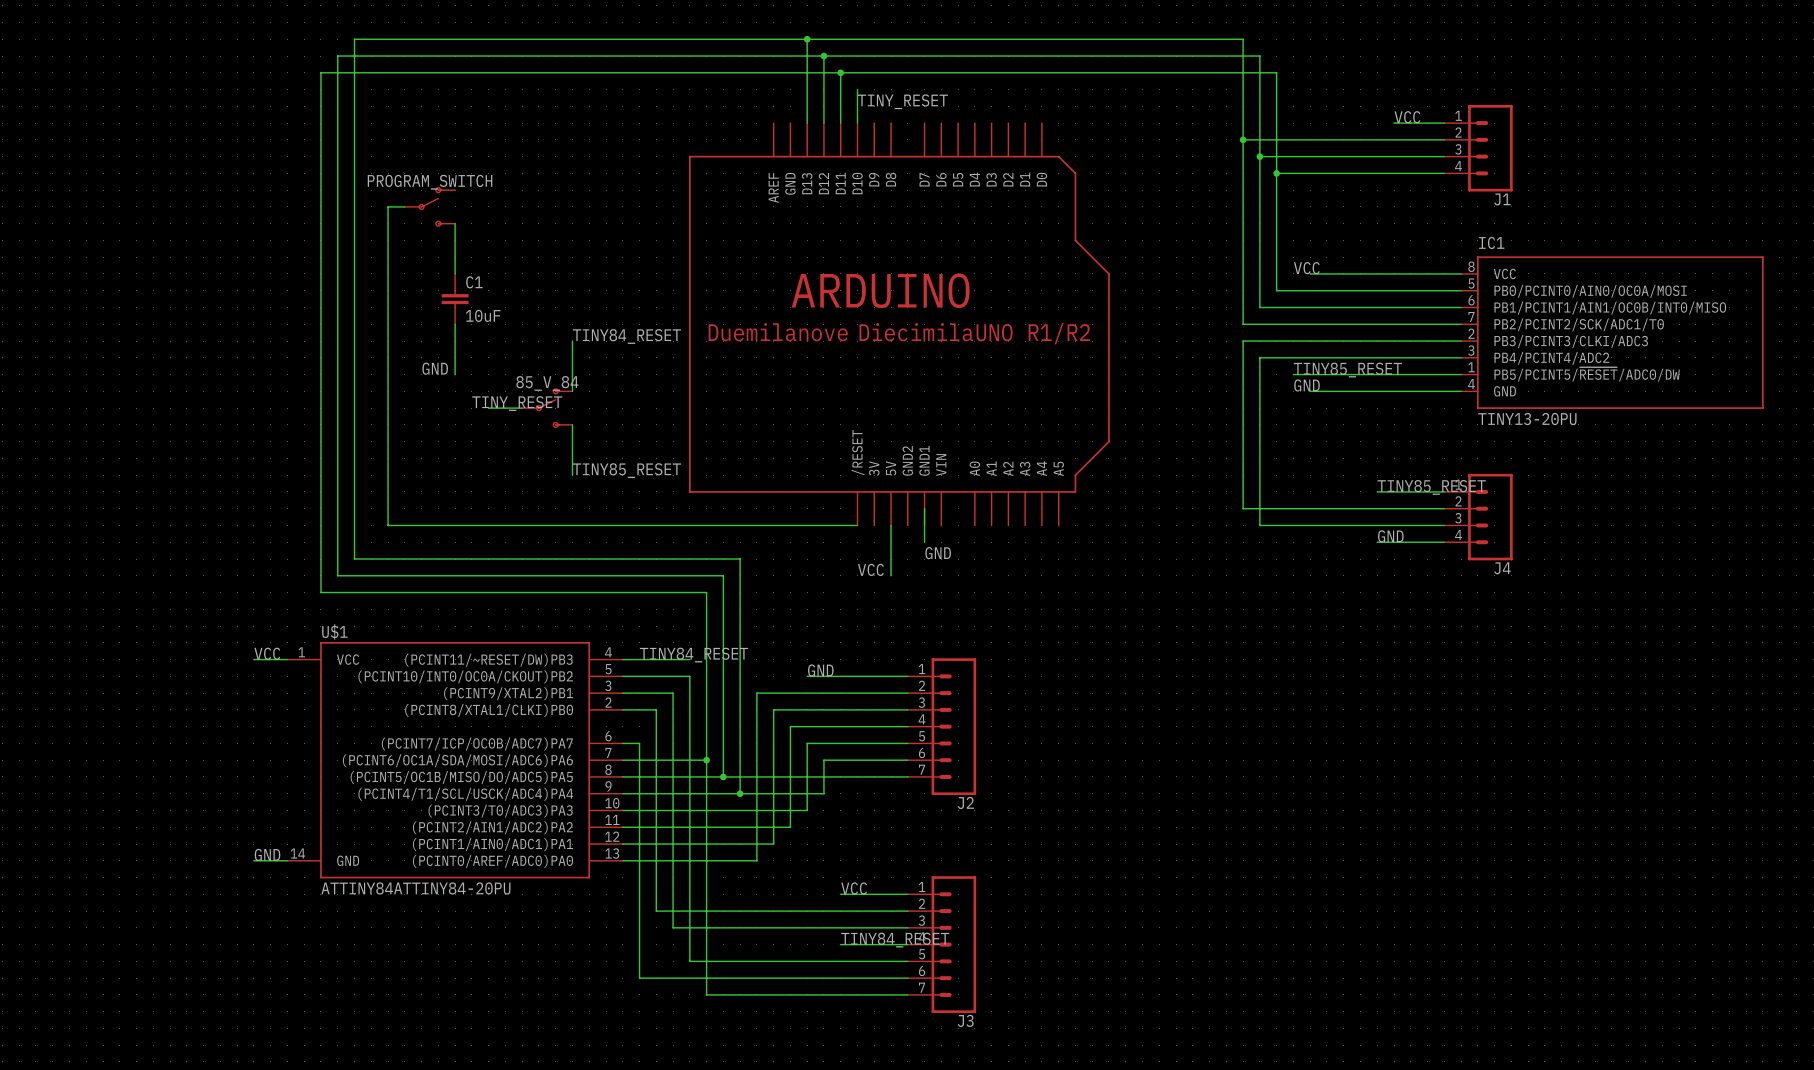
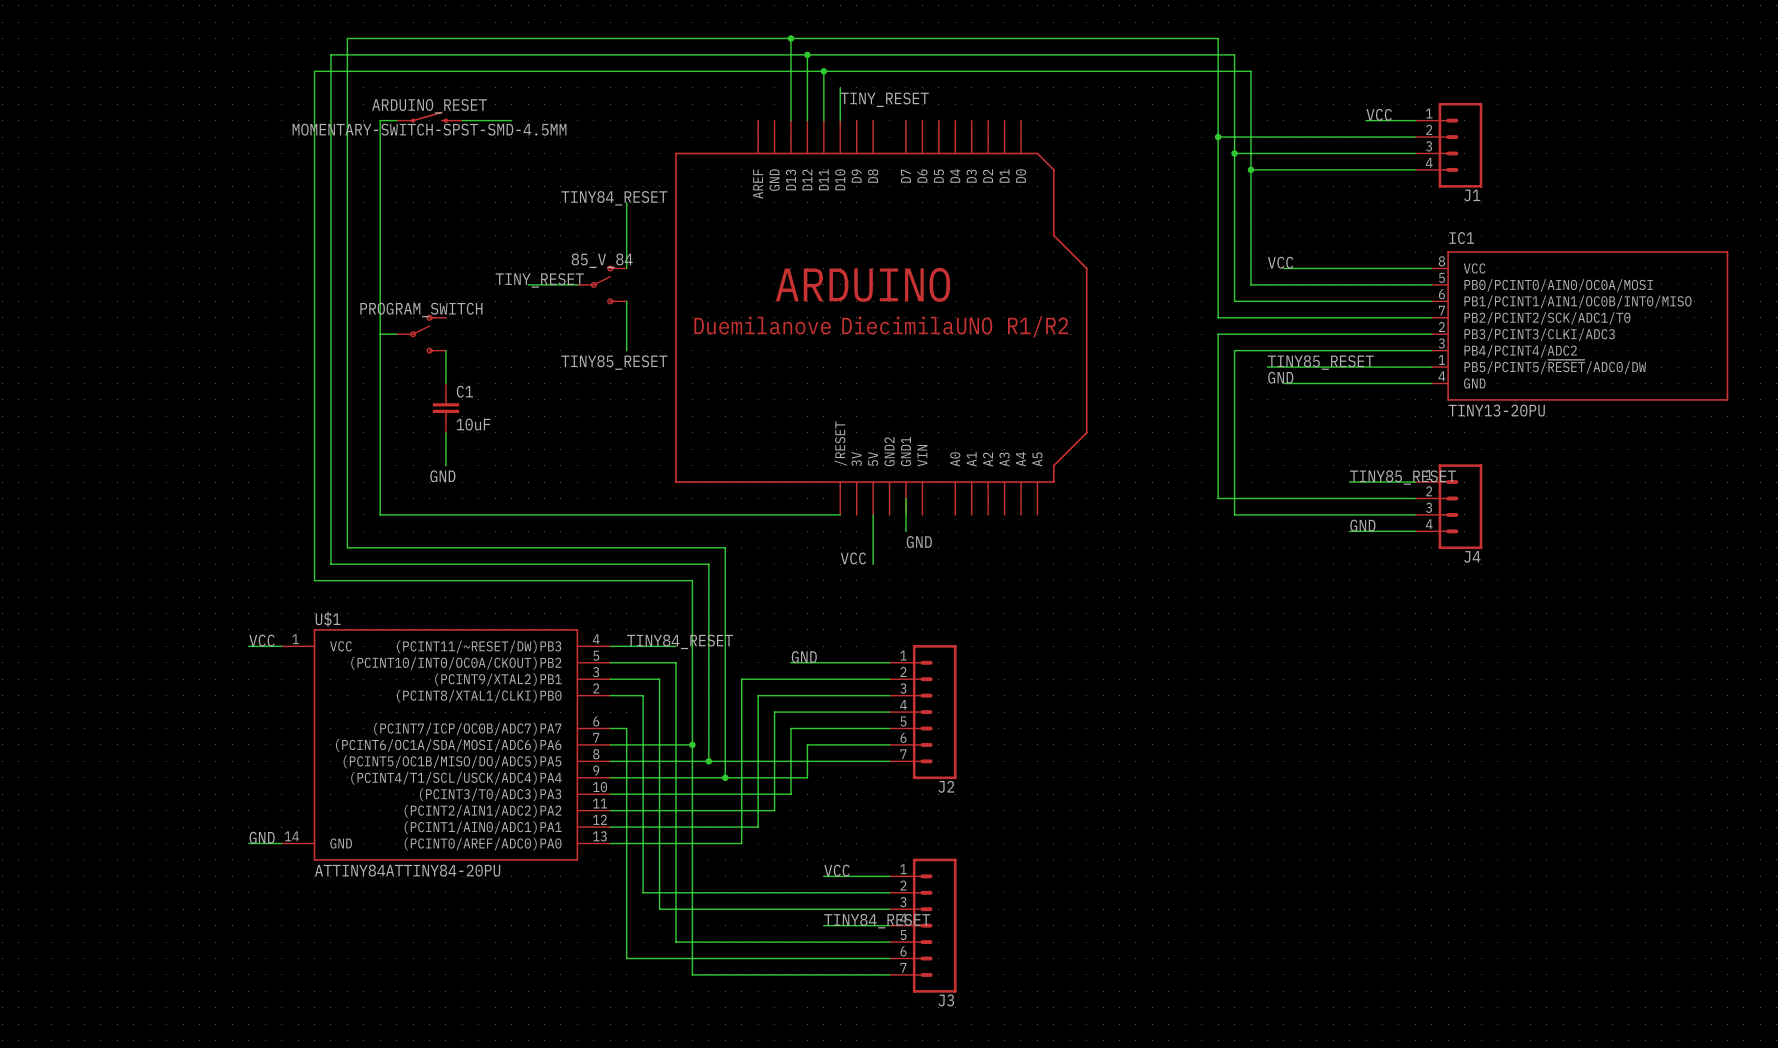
ARDUINO_RESET: none -> MOMENTARY-SWITCH-SPST-SMD-4.5MM (429, 117)
wire: none -> (462, 120) (511, 120)
wire: (388, 206) (404, 206) -> (380, 202) (380, 120) (396, 120)
PROGRAM_SWITCH position: (429, 206) -> (421, 334)
wire: none -> (626, 202) (626, 268)
wire: (455, 223) (455, 273) -> none
wire: none -> (528, 284) (577, 284)
C1 position: (455, 299) -> (445, 408)
wire: (455, 324) (455, 357) -> (445, 432) (445, 465)
label position: TINY84_RESET (626, 336) -> TINY84_RESET (614, 198)
wire: none -> (380, 334) (396, 334)
wire: (572, 341) (572, 391) -> (626, 301) (626, 350)
label position: GND (435, 368) -> GND (442, 476)
wire: none -> (445, 367) (445, 383)
label position: TINY_RESET (517, 403) -> TINY_RESET (539, 280)
wire: (488, 408) (522, 408) -> none
85_V_84 position: (547, 408) -> (602, 284)
wire: (572, 424) (572, 475) -> none
label position: TINY85_RESET (626, 470) -> TINY85_RESET (614, 362)

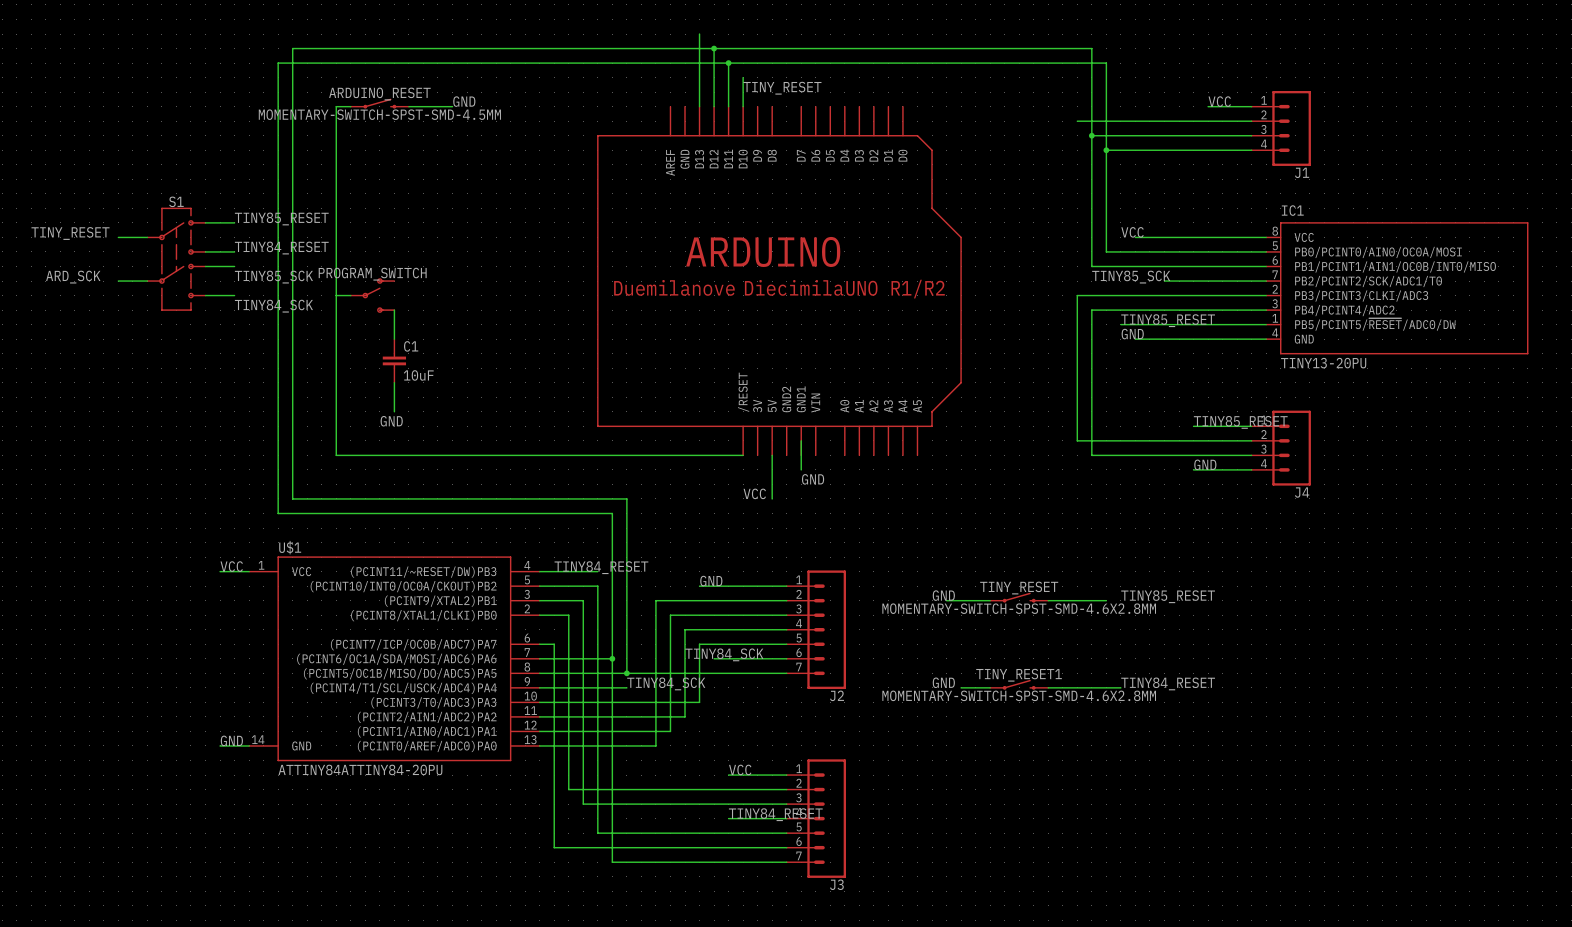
junction: (790, 38) -> none
label: none -> GND (464, 101)
junction: (1218, 137) -> none
label: TINY84_RESET (614, 198) -> none
wire: (626, 202) (626, 268) -> none
label: none -> TINY85_RESET (281, 218)
wire: none -> (205, 222) (234, 222)
label: none -> TINY_RESET (70, 233)
wire: none -> (118, 237) (147, 237)
label: none -> TINY84_RESET (281, 248)
label: TINY_RESET (539, 280) -> none
wire: none -> (205, 251) (234, 251)
wire: (528, 284) (577, 284) -> none
85_V_84: (602, 284) -> none
S1: none -> (176, 259)
wire: none -> (205, 266) (234, 266)
wire: (626, 301) (626, 350) -> none
label: none -> ARD_SCK (73, 277)
label: none -> TINY85_SCK (273, 277)
label: none -> TINY85_SCK (1131, 277)
wire: none -> (118, 281) (147, 281)
wire: (1316, 317) (1218, 317) (1218, 38) (347, 38) (347, 547) (725, 547) (725, 777) -> none
wire: none -> (205, 295) (234, 295)
label: none -> TINY84_SCK (273, 306)
label: TINY85_RESET (614, 362) -> none
label: none -> GND (943, 595)
label: none -> TINY85_RESET (1168, 596)
TINY_RESET: none -> MOMENTARY-SWITCH-SPST-SMD-4.6X2.8MM (1019, 597)
wire: none -> (946, 600) (990, 600)
wire: none -> (1048, 600) (1106, 600)
label: none -> TINY84_SCK (724, 654)
wire: (807, 744) (807, 777) (708, 777) -> none
label: none -> GND (943, 682)
label: none -> TINY84_SCK (666, 683)
label: none -> TINY84_RESET (1168, 683)
TINY_RESET1: none -> MOMENTARY-SWITCH-SPST-SMD-4.6X2.8MM (1019, 684)
junction: (725, 777) -> none
wire: none -> (961, 687) (990, 687)
wire: none -> (1048, 687) (1120, 687)

